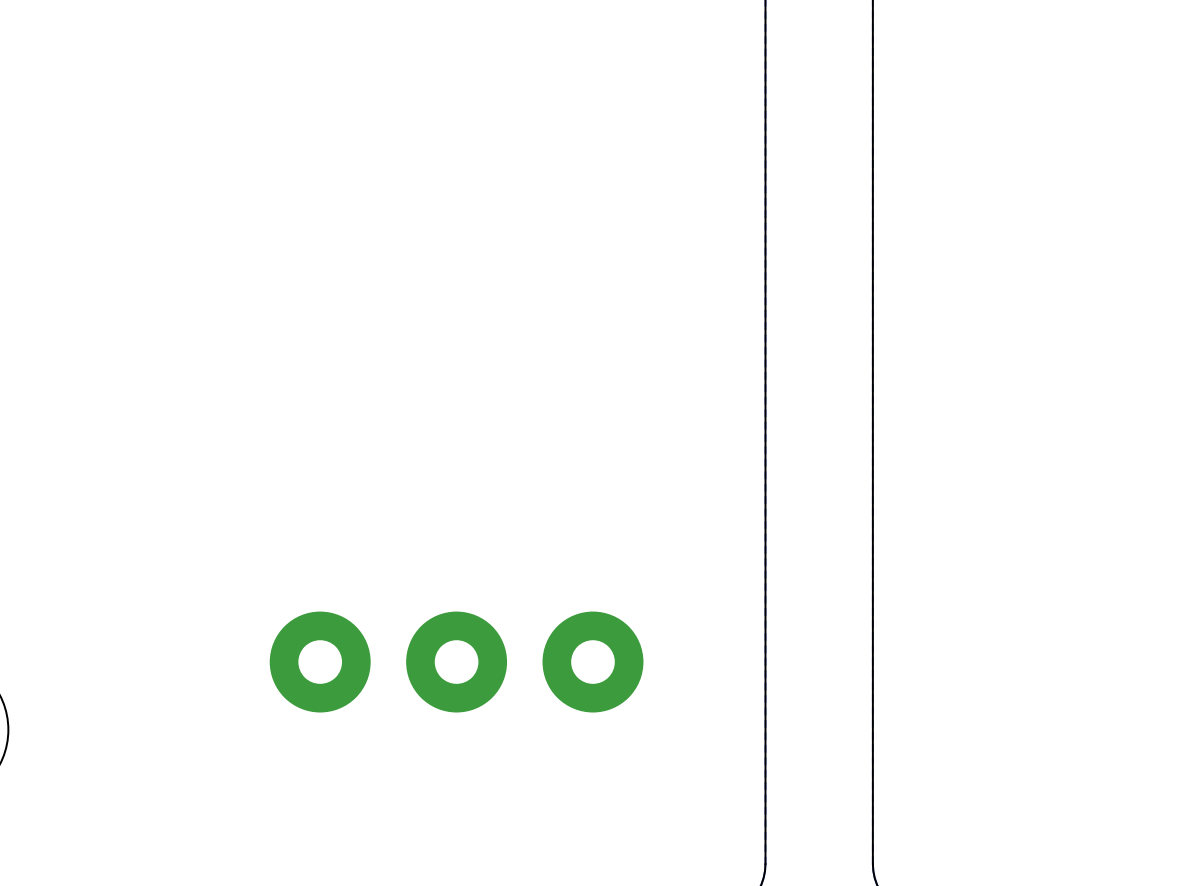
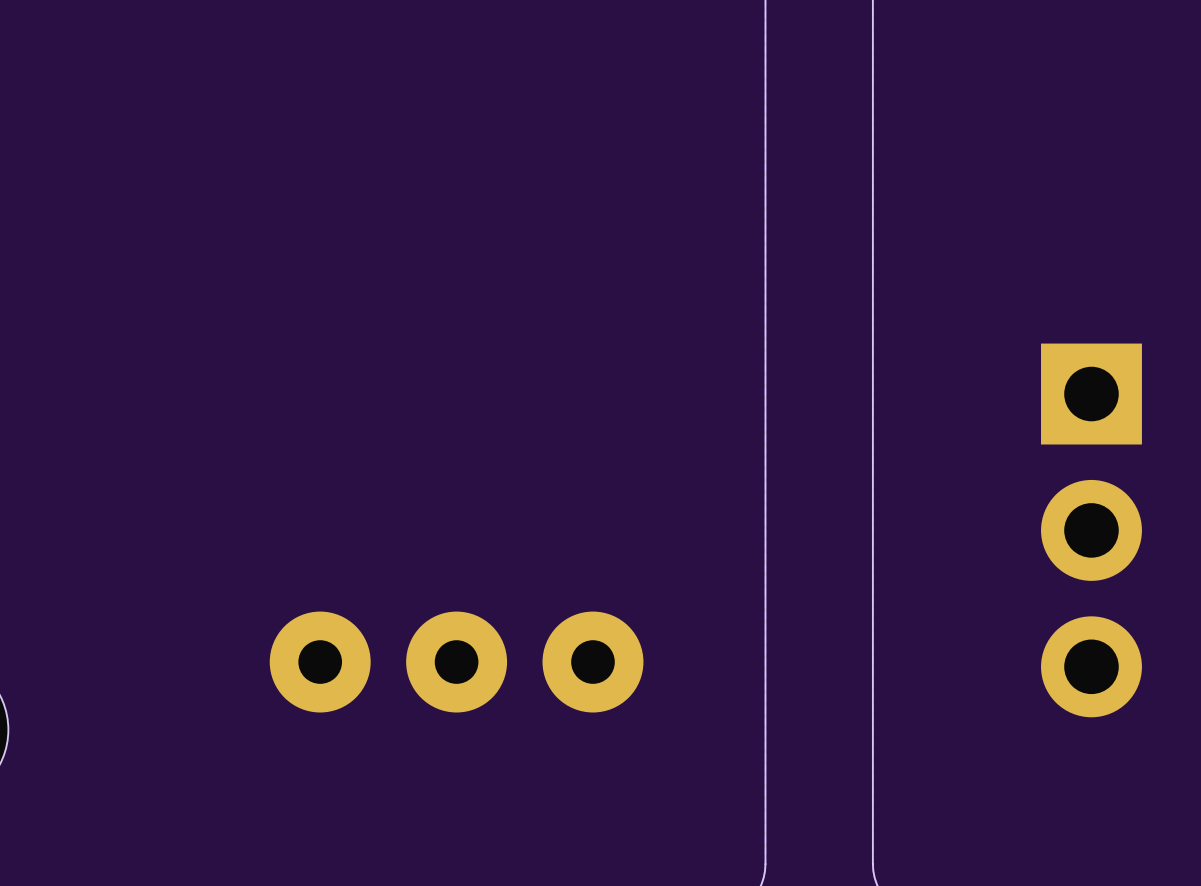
part: none -> (1091, 530)

